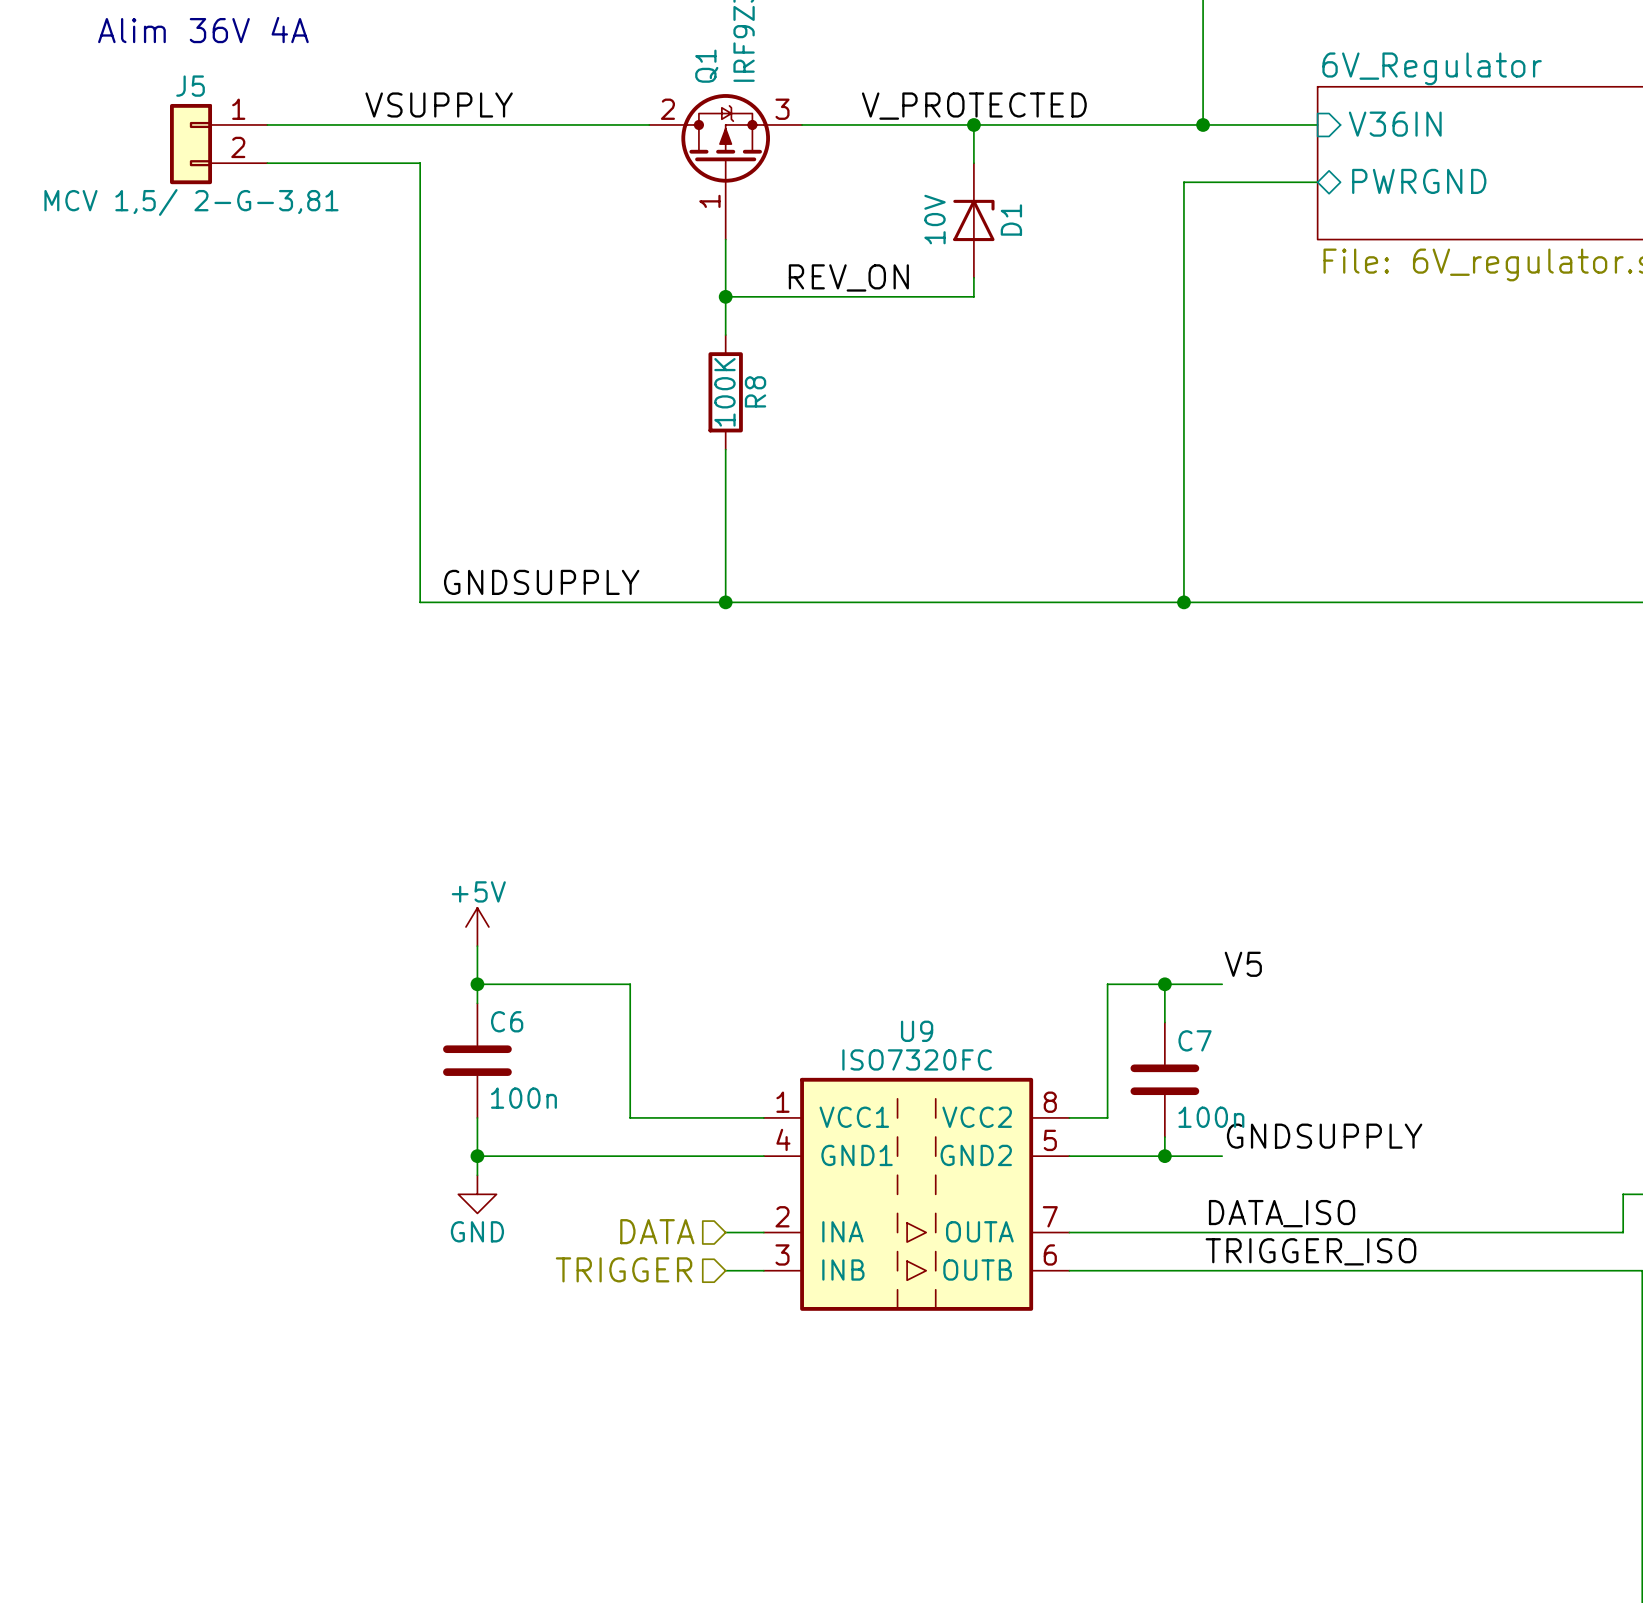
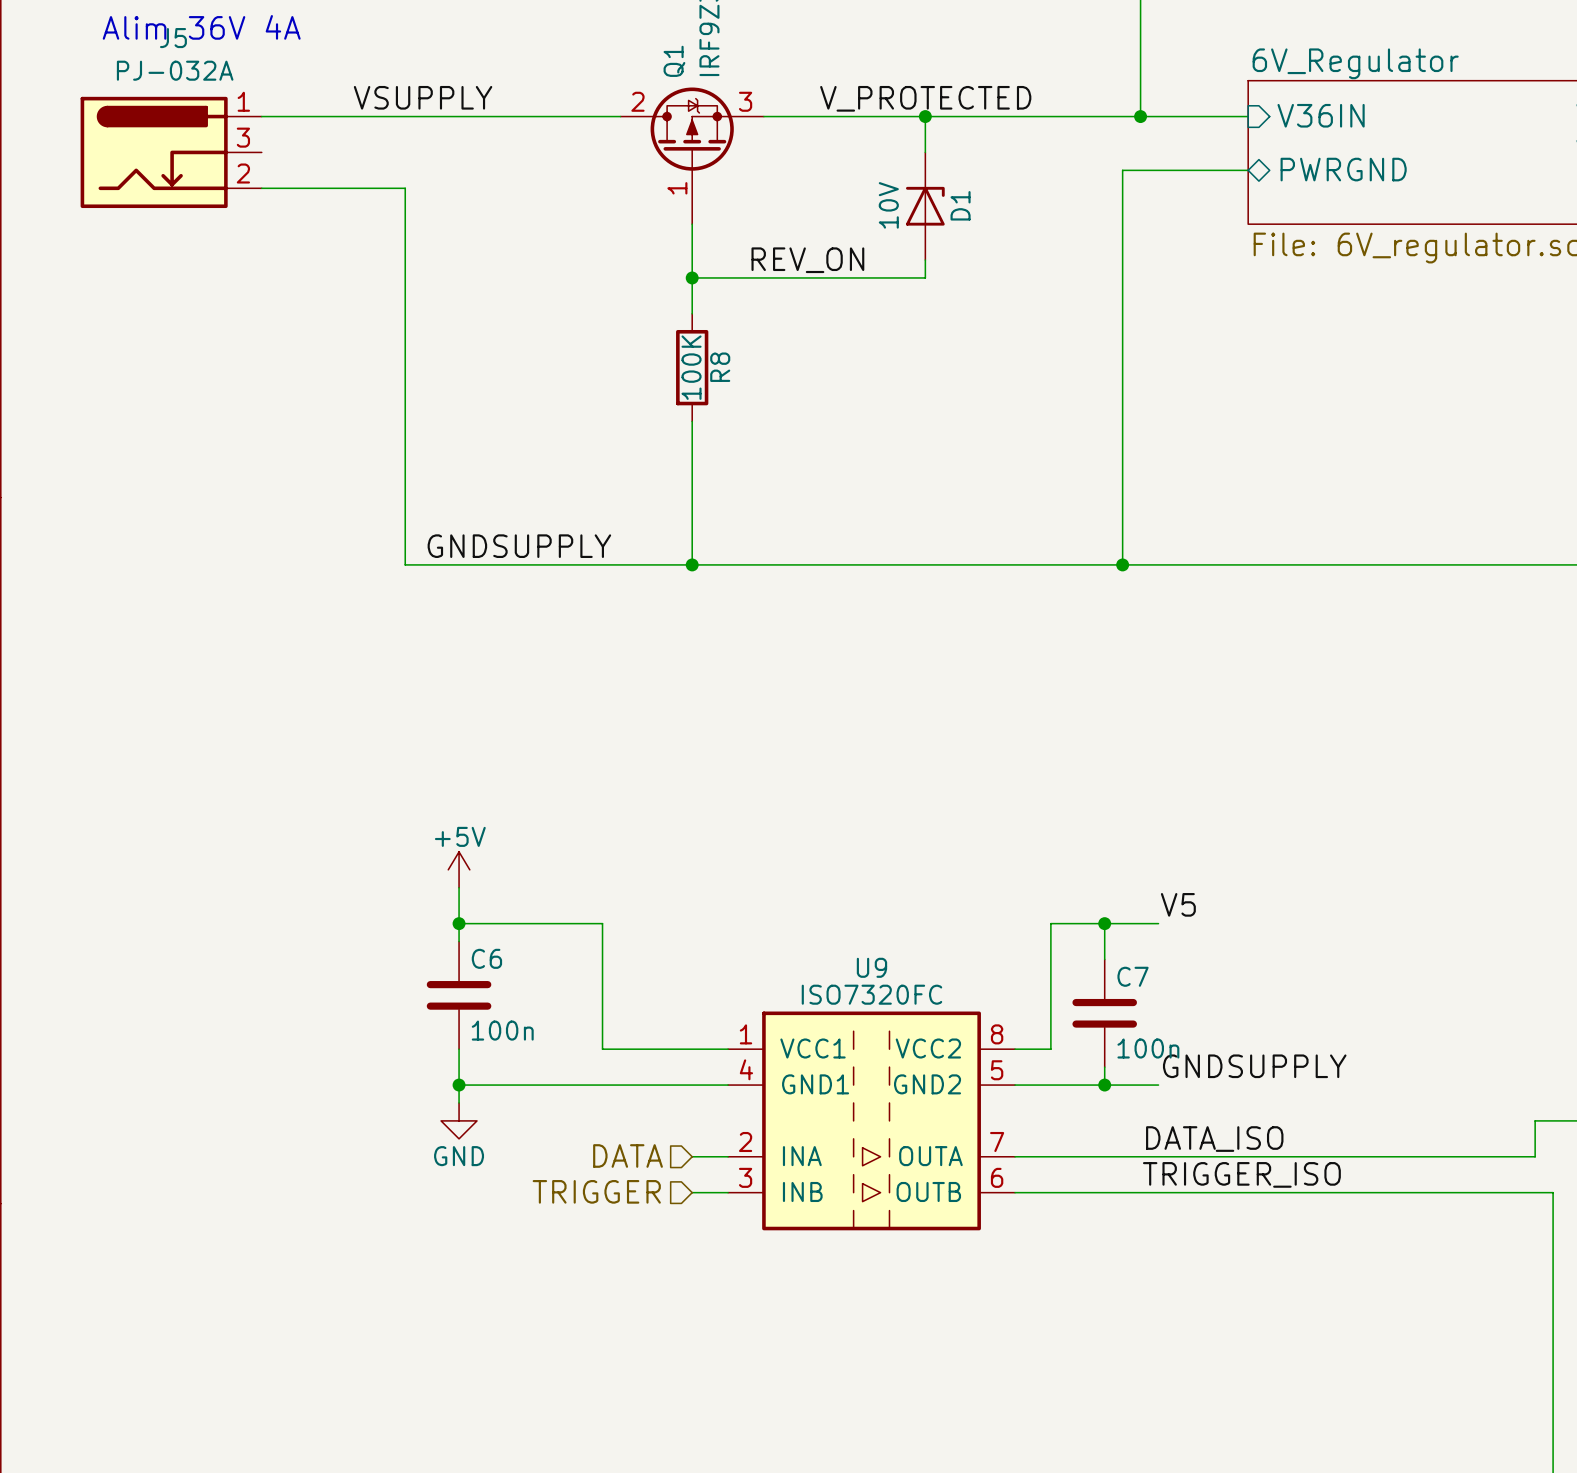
J5 name position: J5 (190, 86) -> J5 (173, 38)
J5 symbol: [169, 103, 268, 185] -> [80, 96, 262, 209]
wire: (267, 163) (420, 163) (420, 201) -> (261, 188) (405, 188)
J5 value: MCV 1,5/ 2-G-3,81 (191, 202) -> PJ-032A (175, 70)

